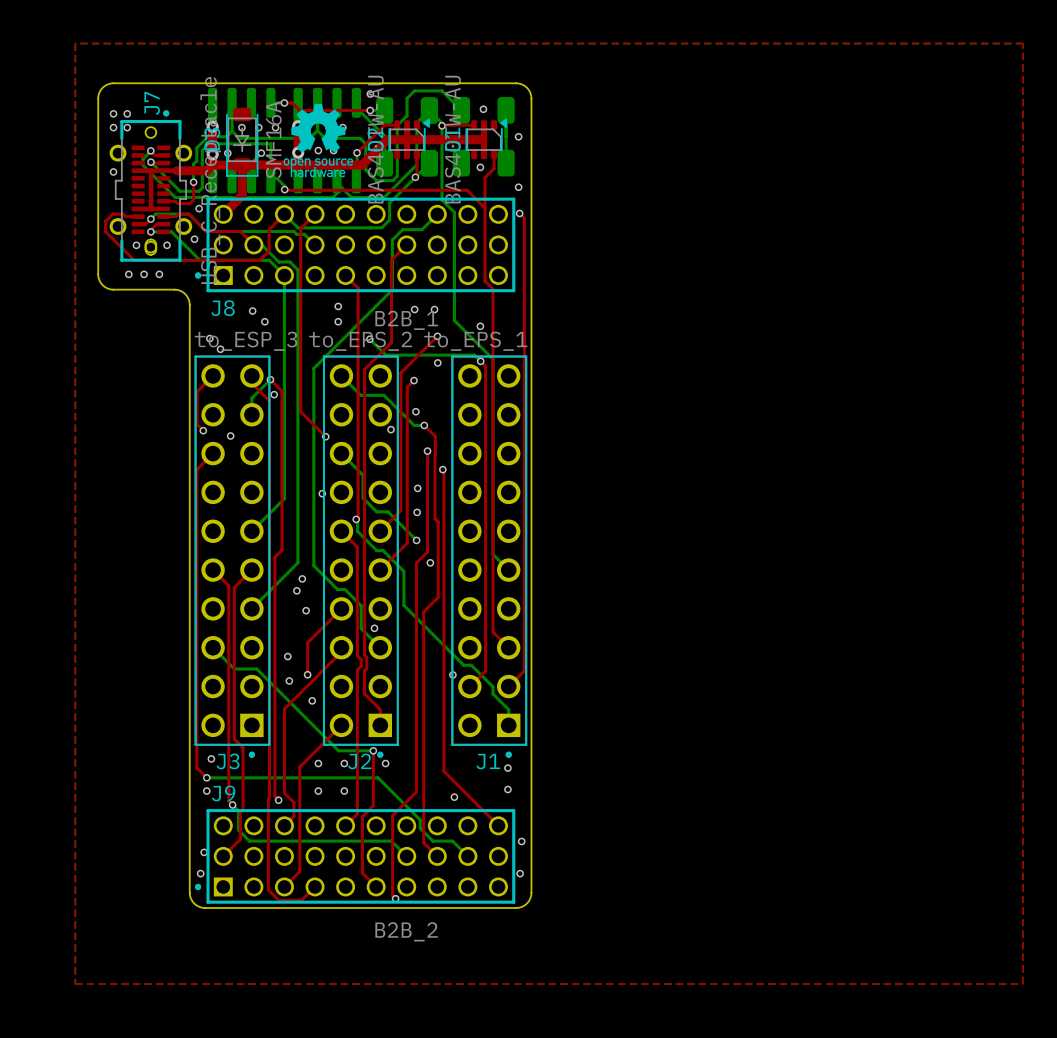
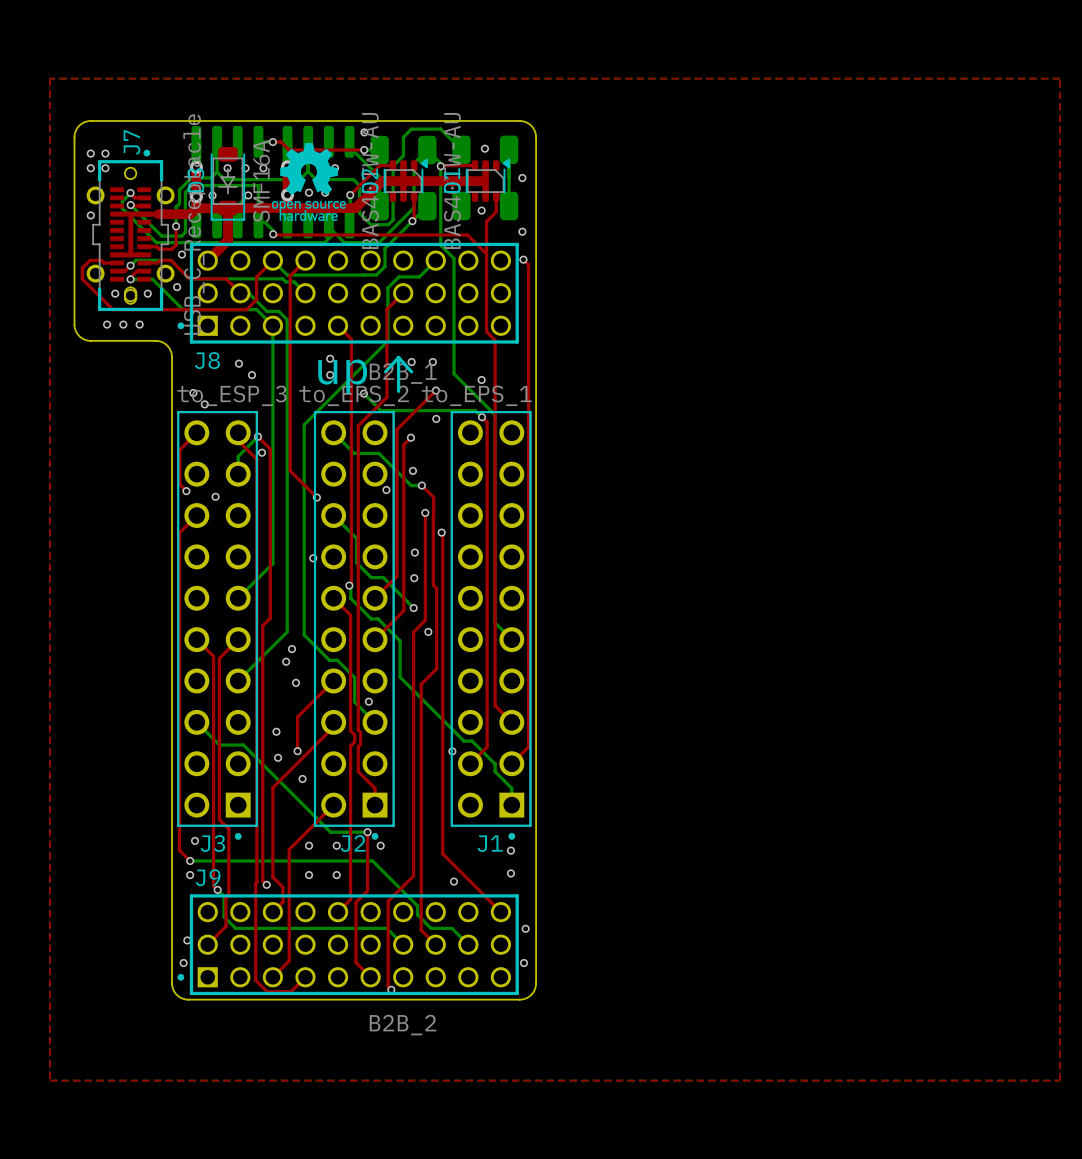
line: none -> (398, 357) (385, 371)
line: none -> (398, 357) (411, 371)
line: none -> (398, 357) (398, 391)
text: none -> up (342, 376)

